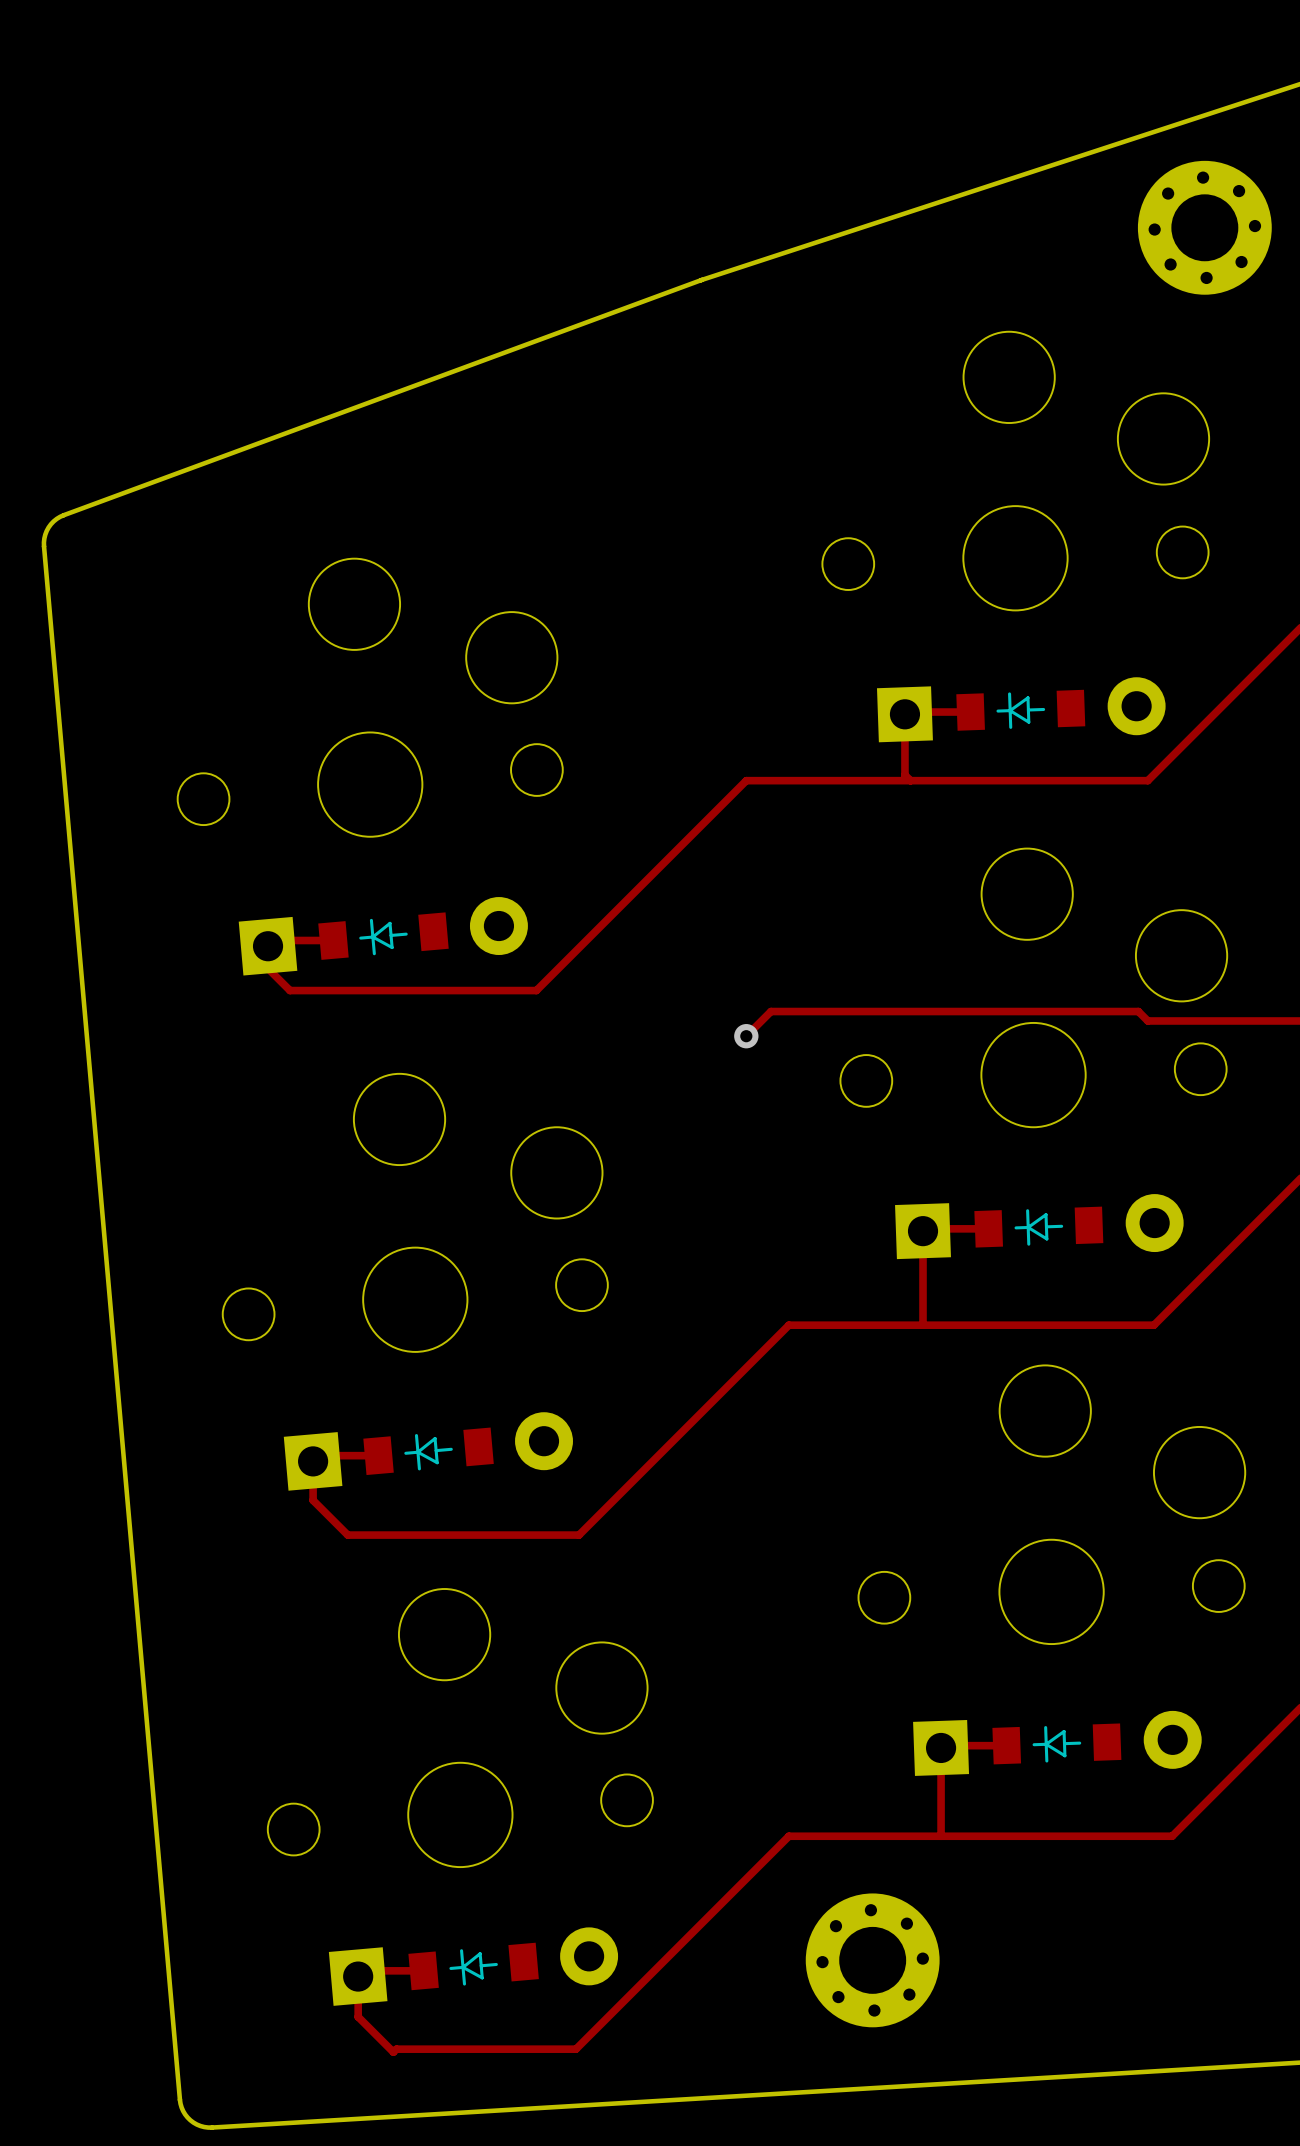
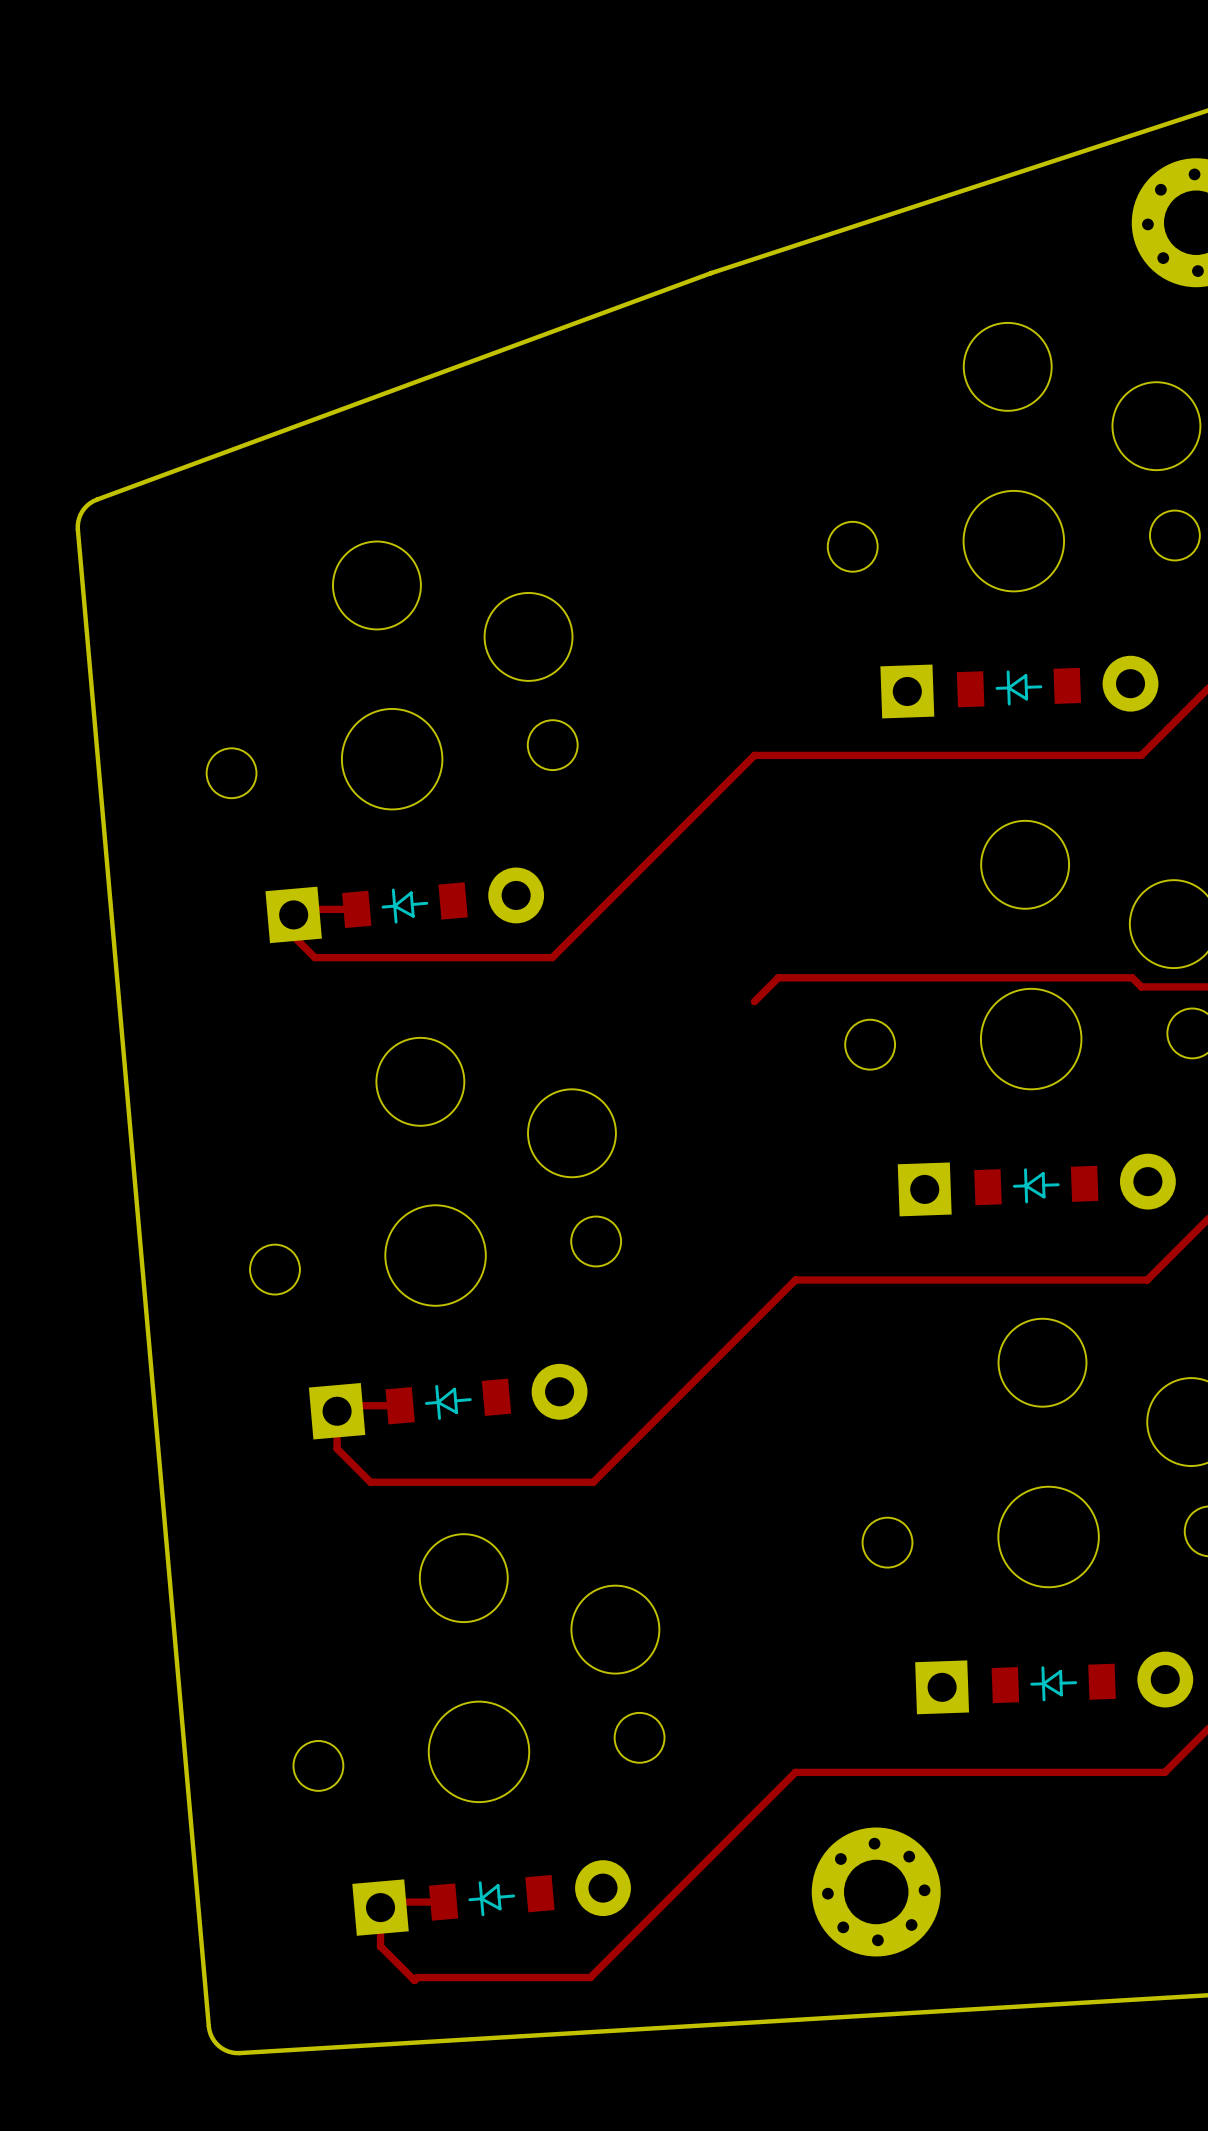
track: (970, 712) (907, 712) (904, 714) (904, 775) (910, 780) -> none
via: (746, 1036) -> none
track: (988, 1228) (925, 1228) (923, 1231) (923, 1324) -> none
track: (1006, 1745) (943, 1745) (941, 1747) (941, 1836) -> none

